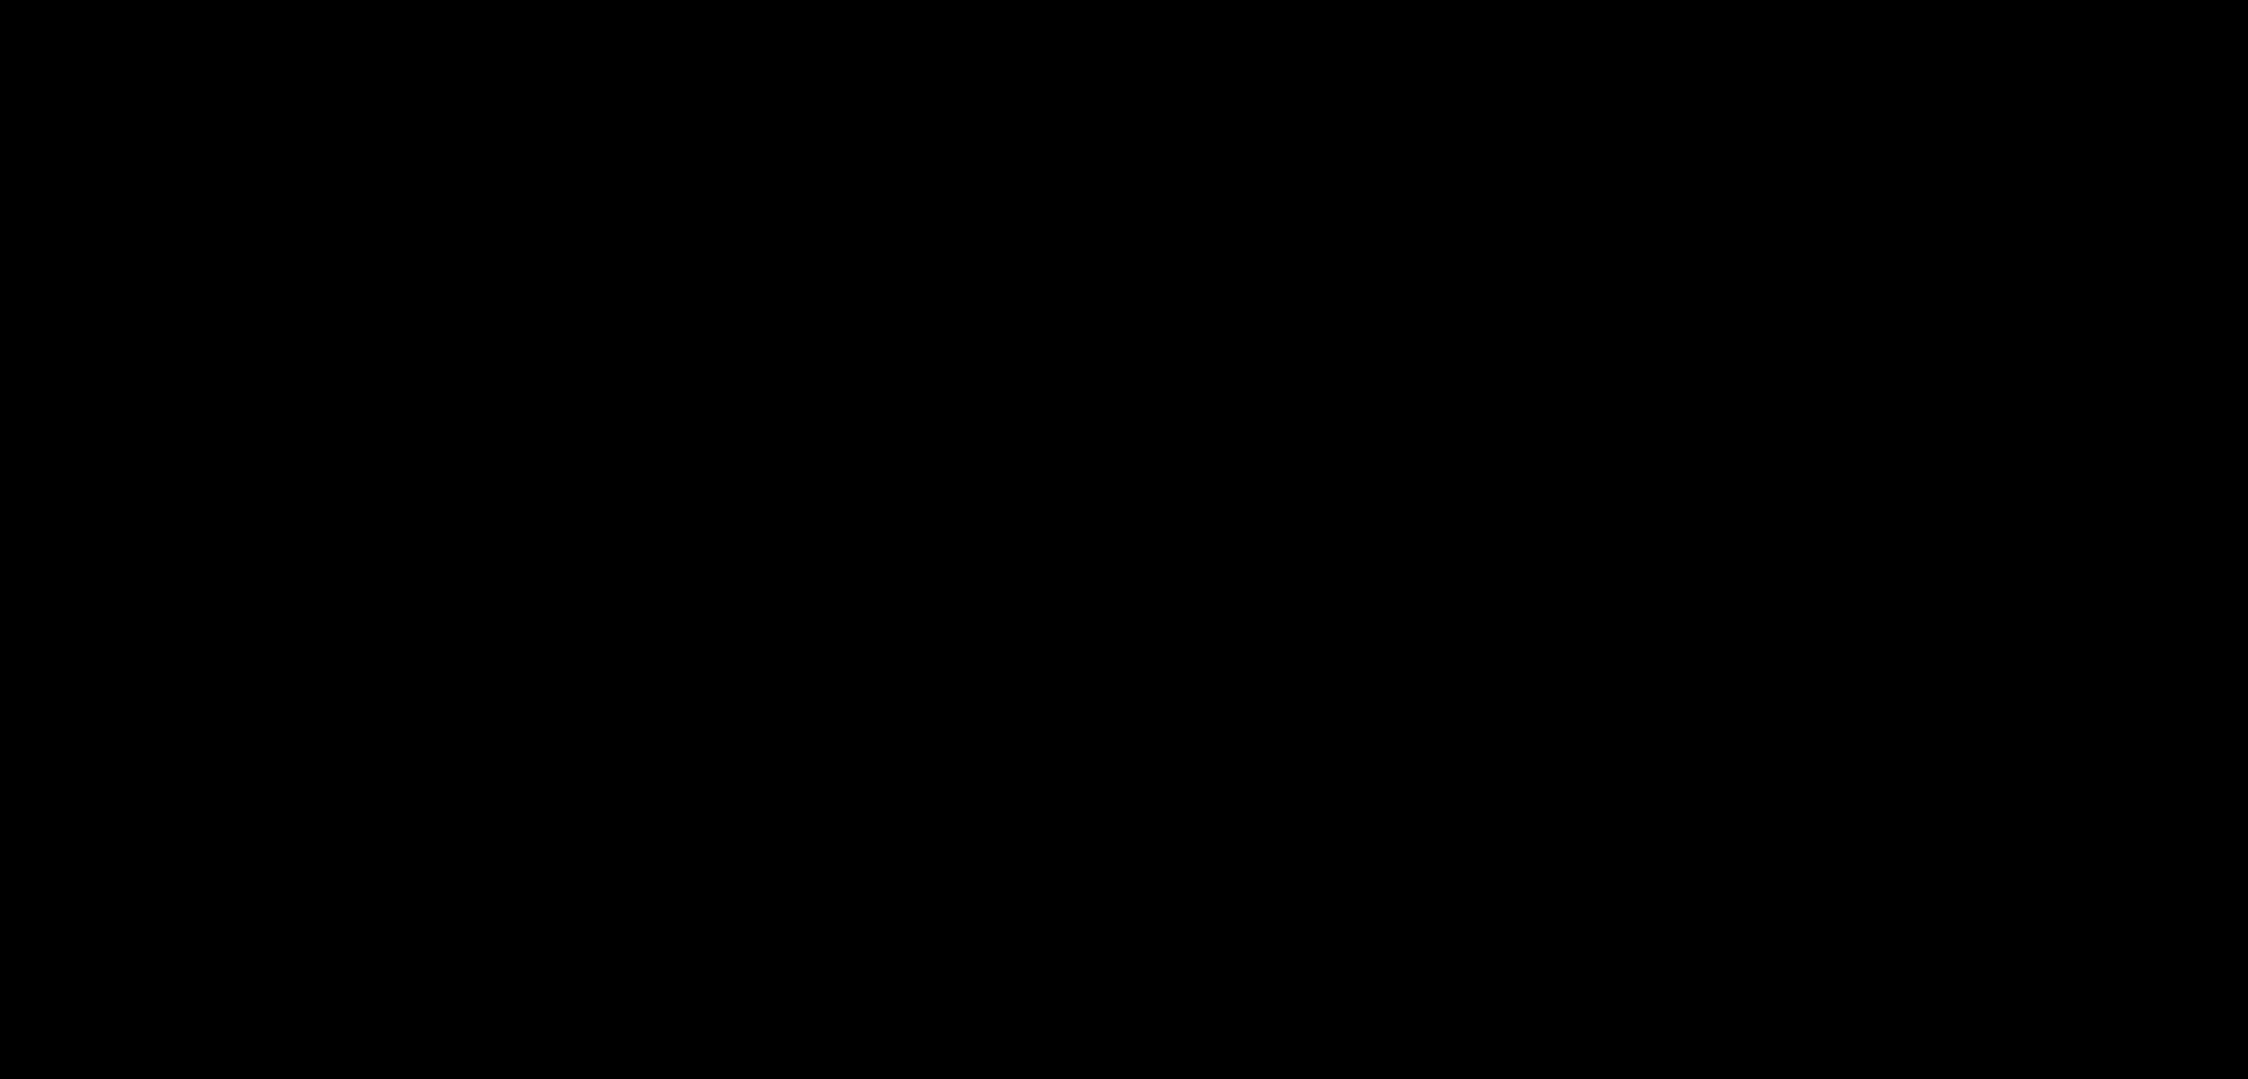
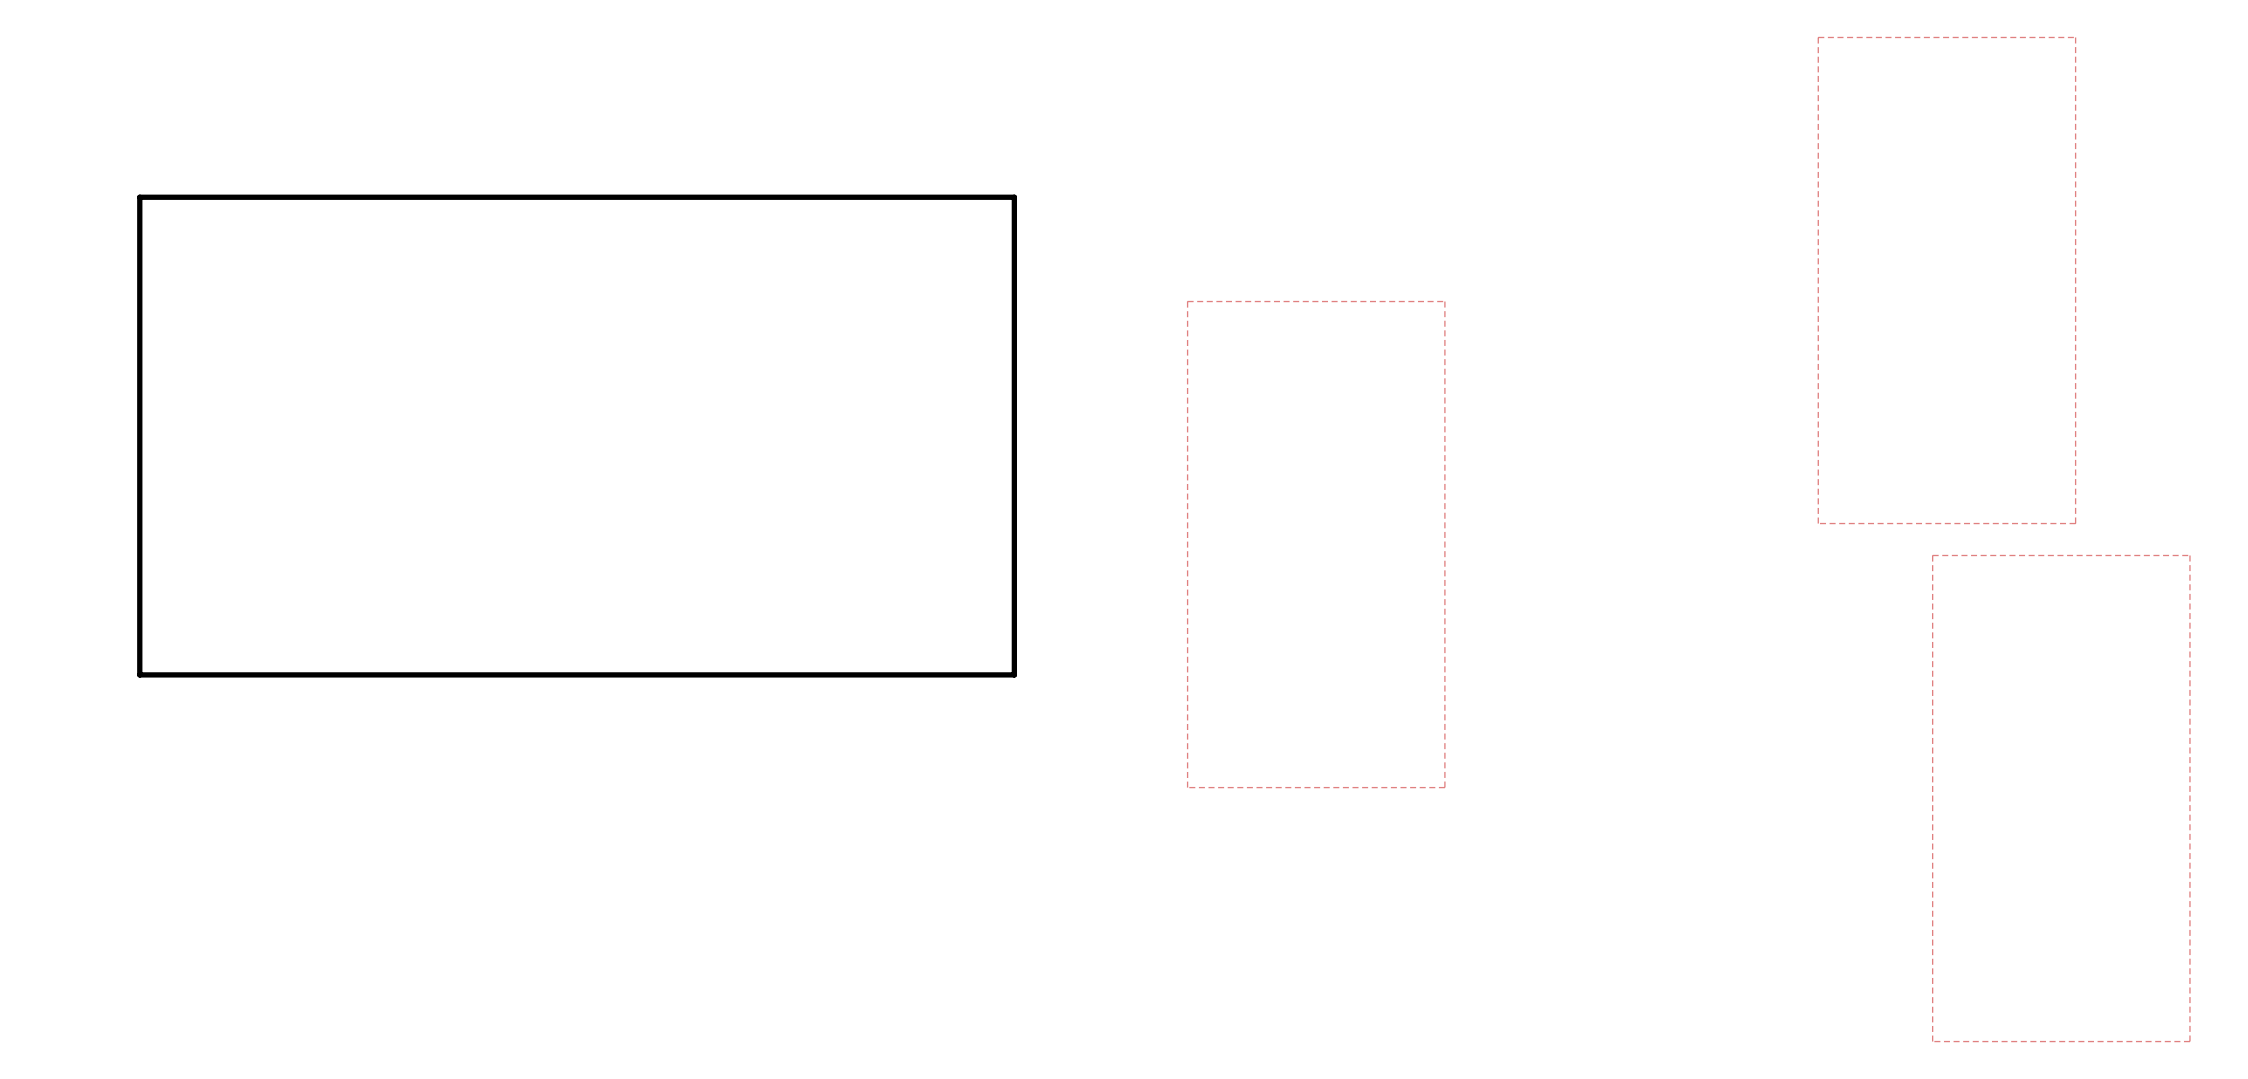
zone outline: none -> (1818, 37) (2075, 37) (2075, 523) (1818, 523) (1818, 37)
line: none -> (139, 197) (139, 674) (1014, 674) (1014, 197) (139, 197)
zone outline: none -> (1187, 301) (1187, 787) (1444, 787) (1444, 301) (1187, 301)
zone outline: none -> (1932, 555) (2189, 555) (2189, 1041) (1932, 1041) (1932, 555)

